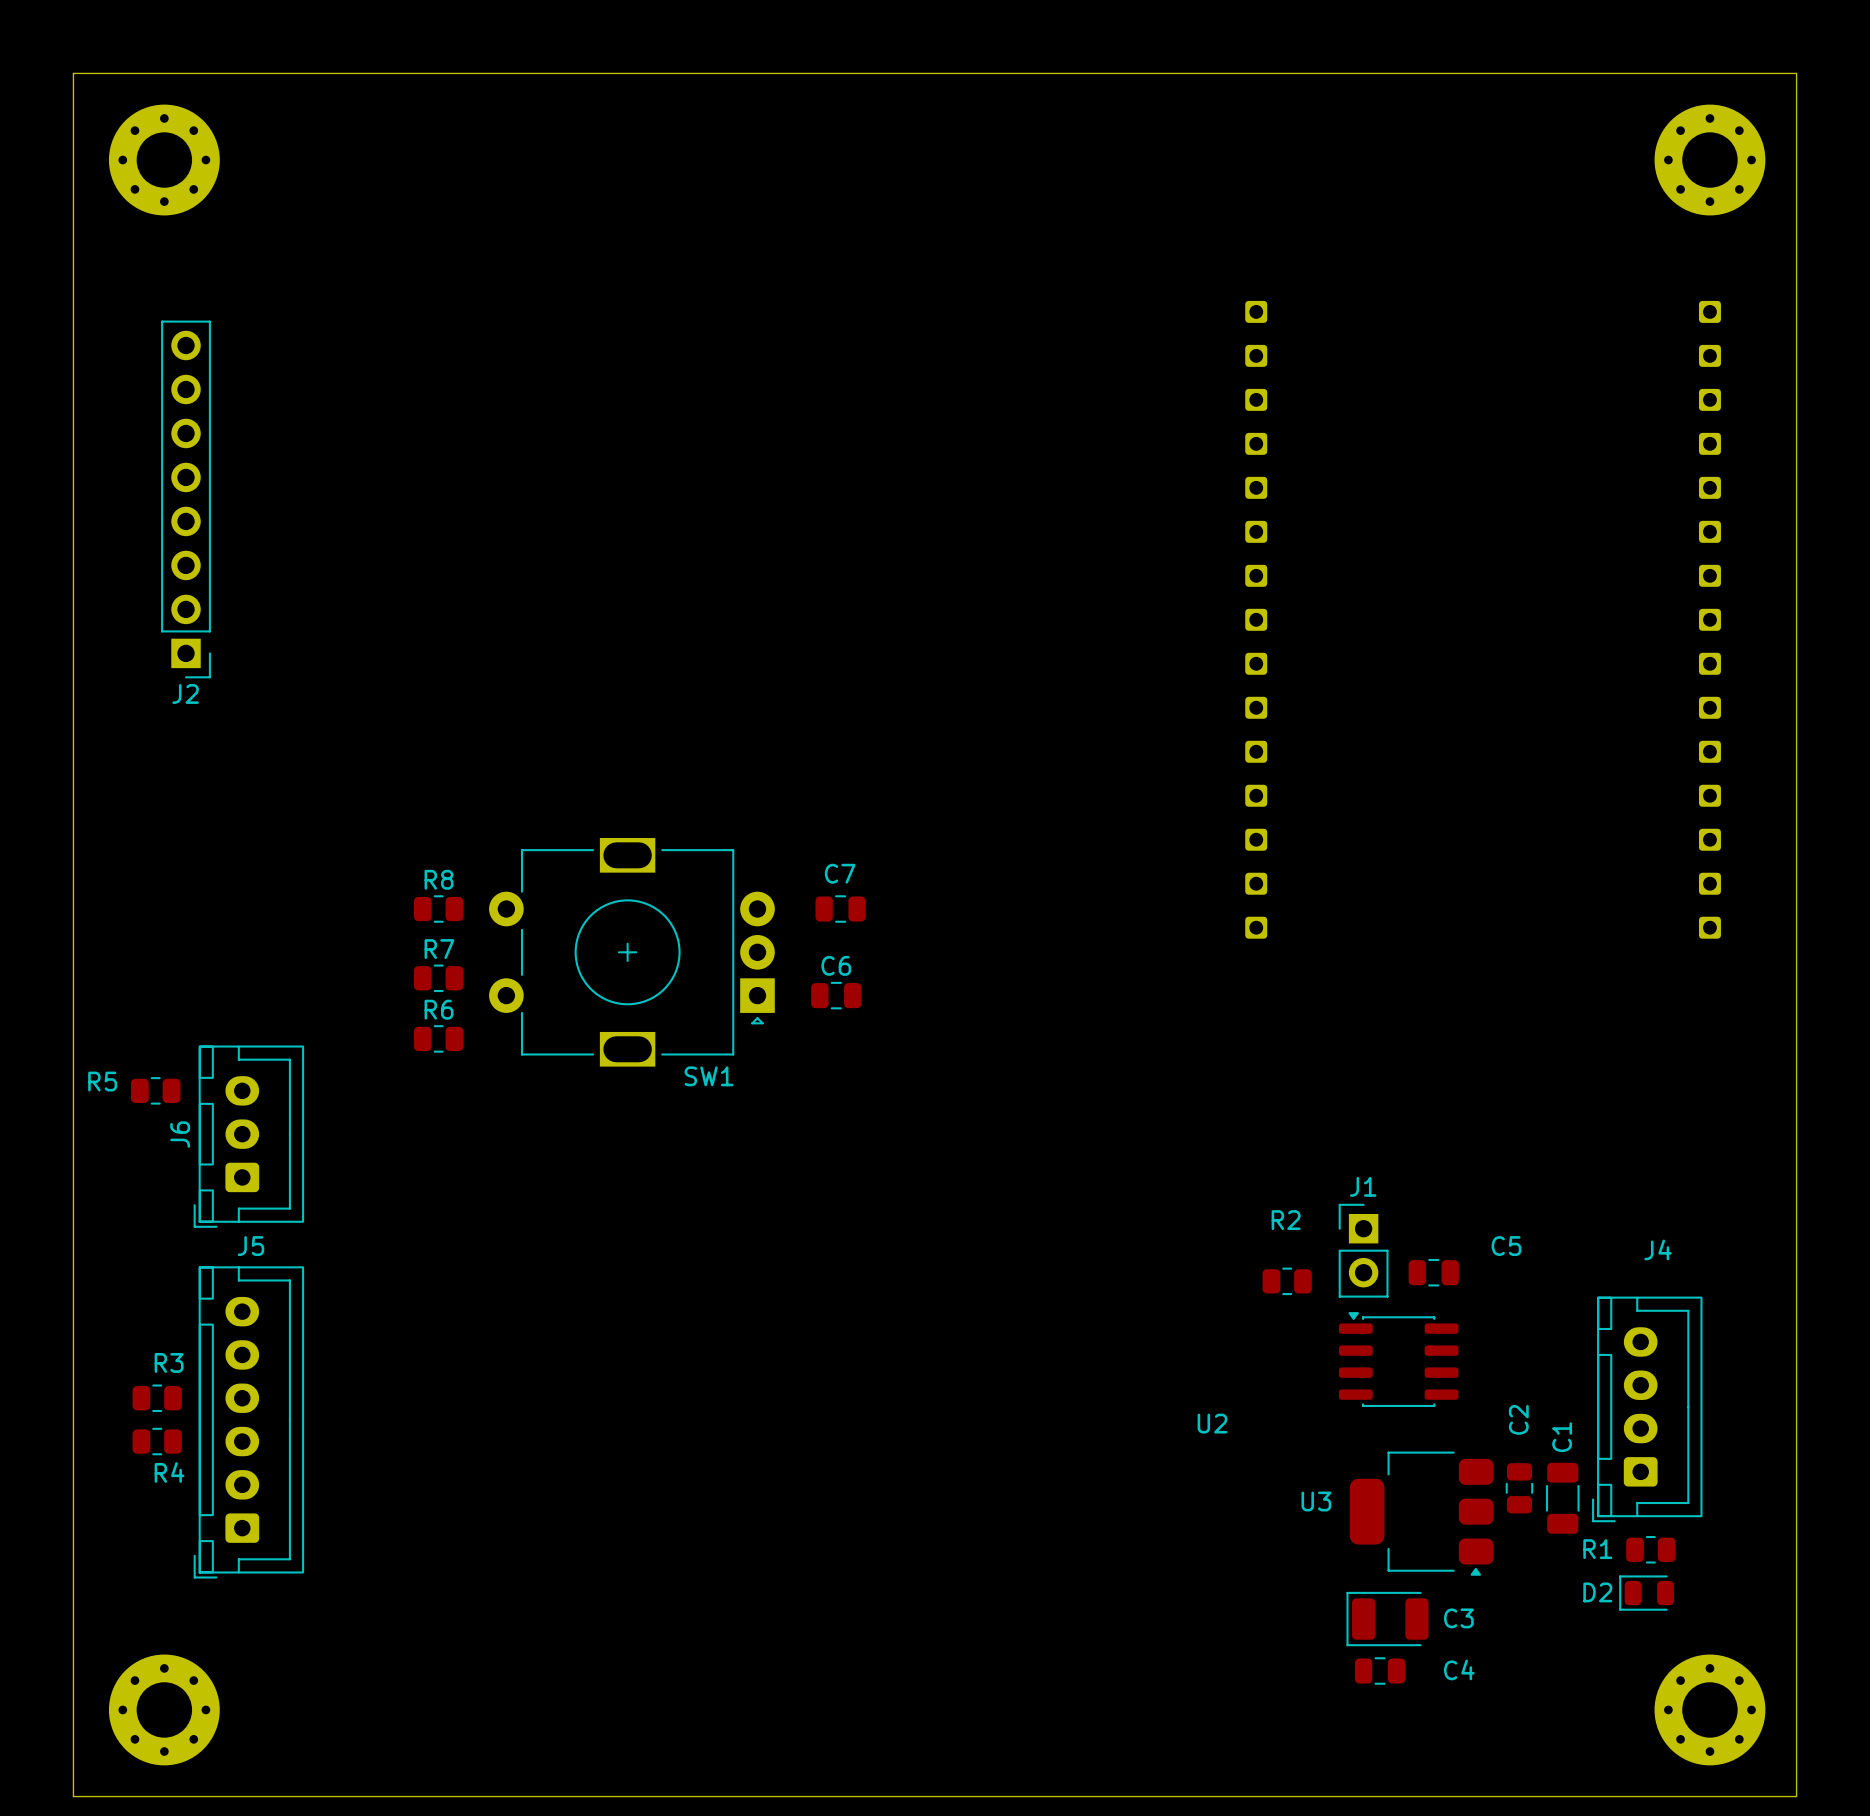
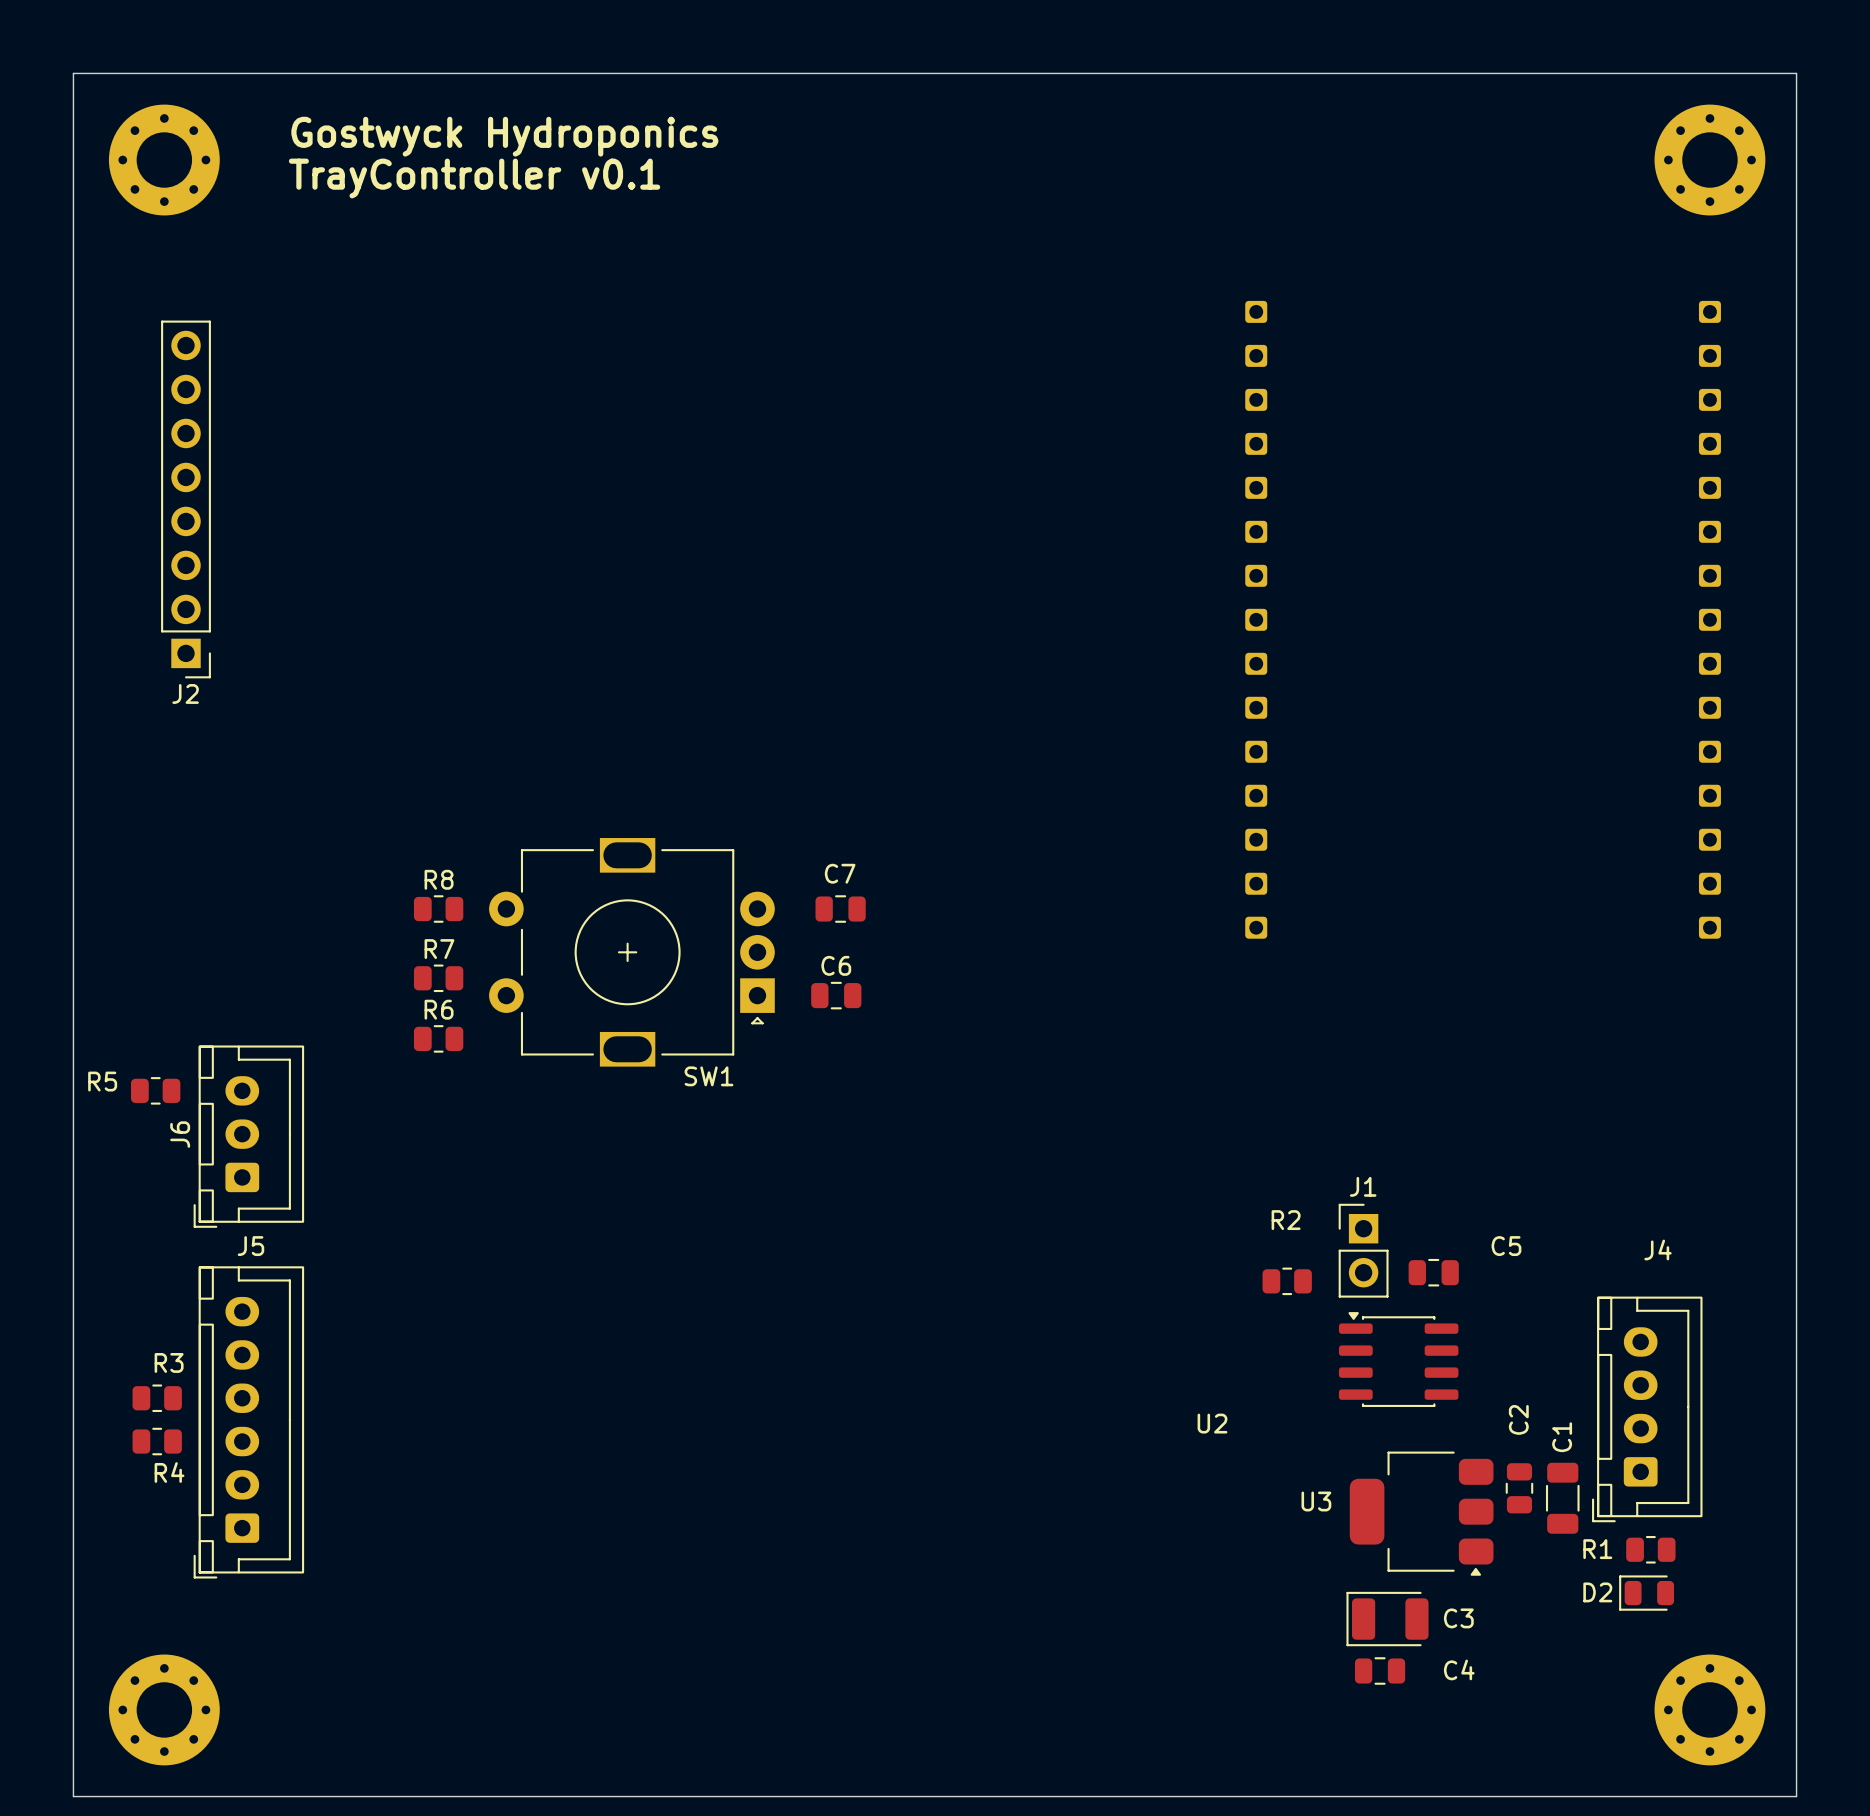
text: none -> Gostwyck Hydroponics (504, 136)
text: none -> TrayController v0.1 (474, 178)

